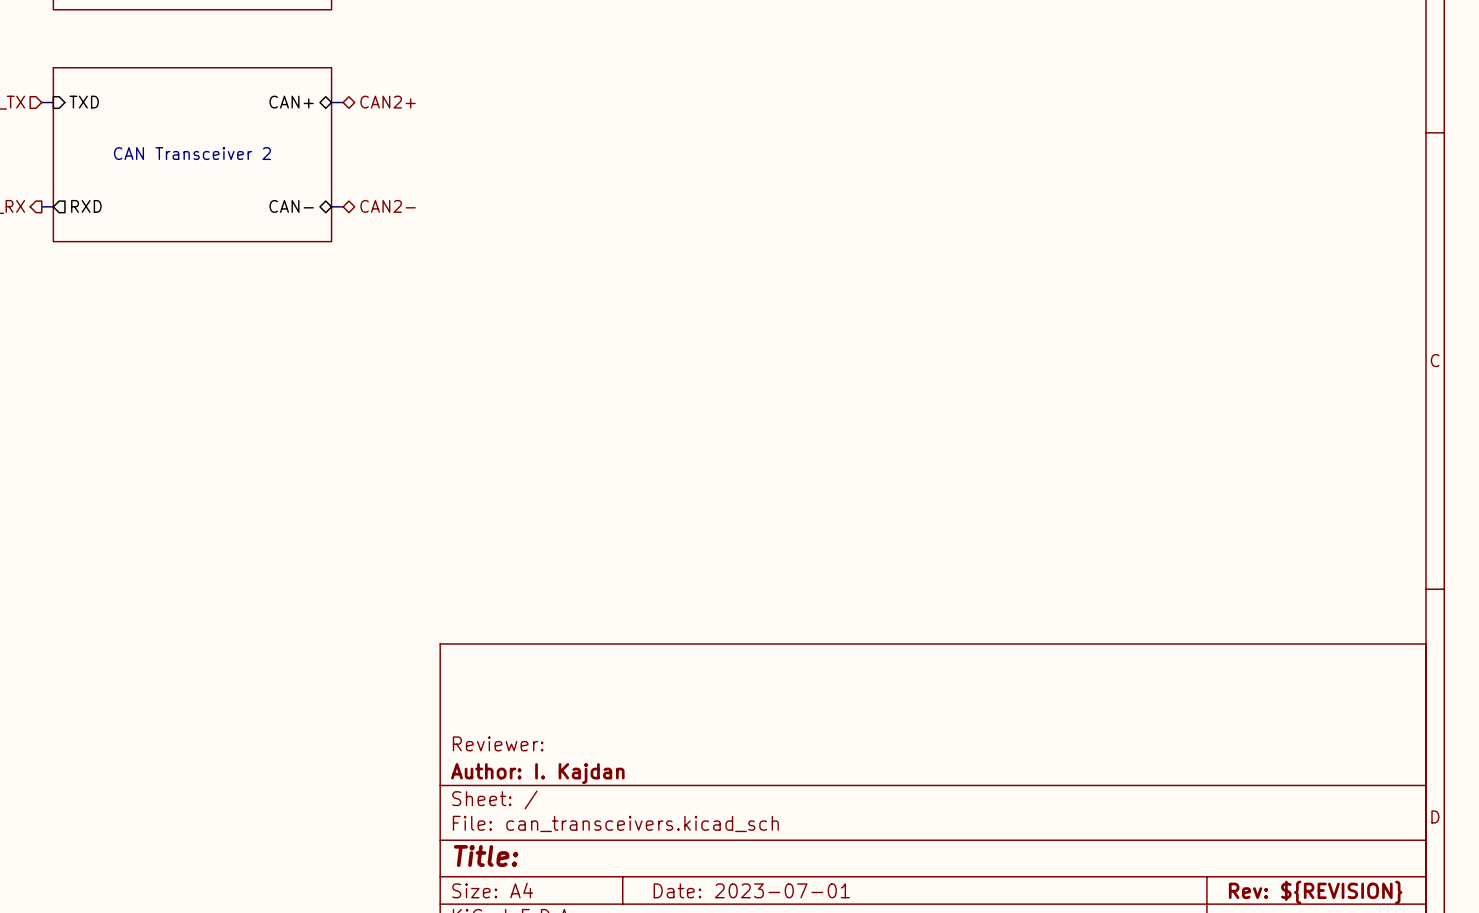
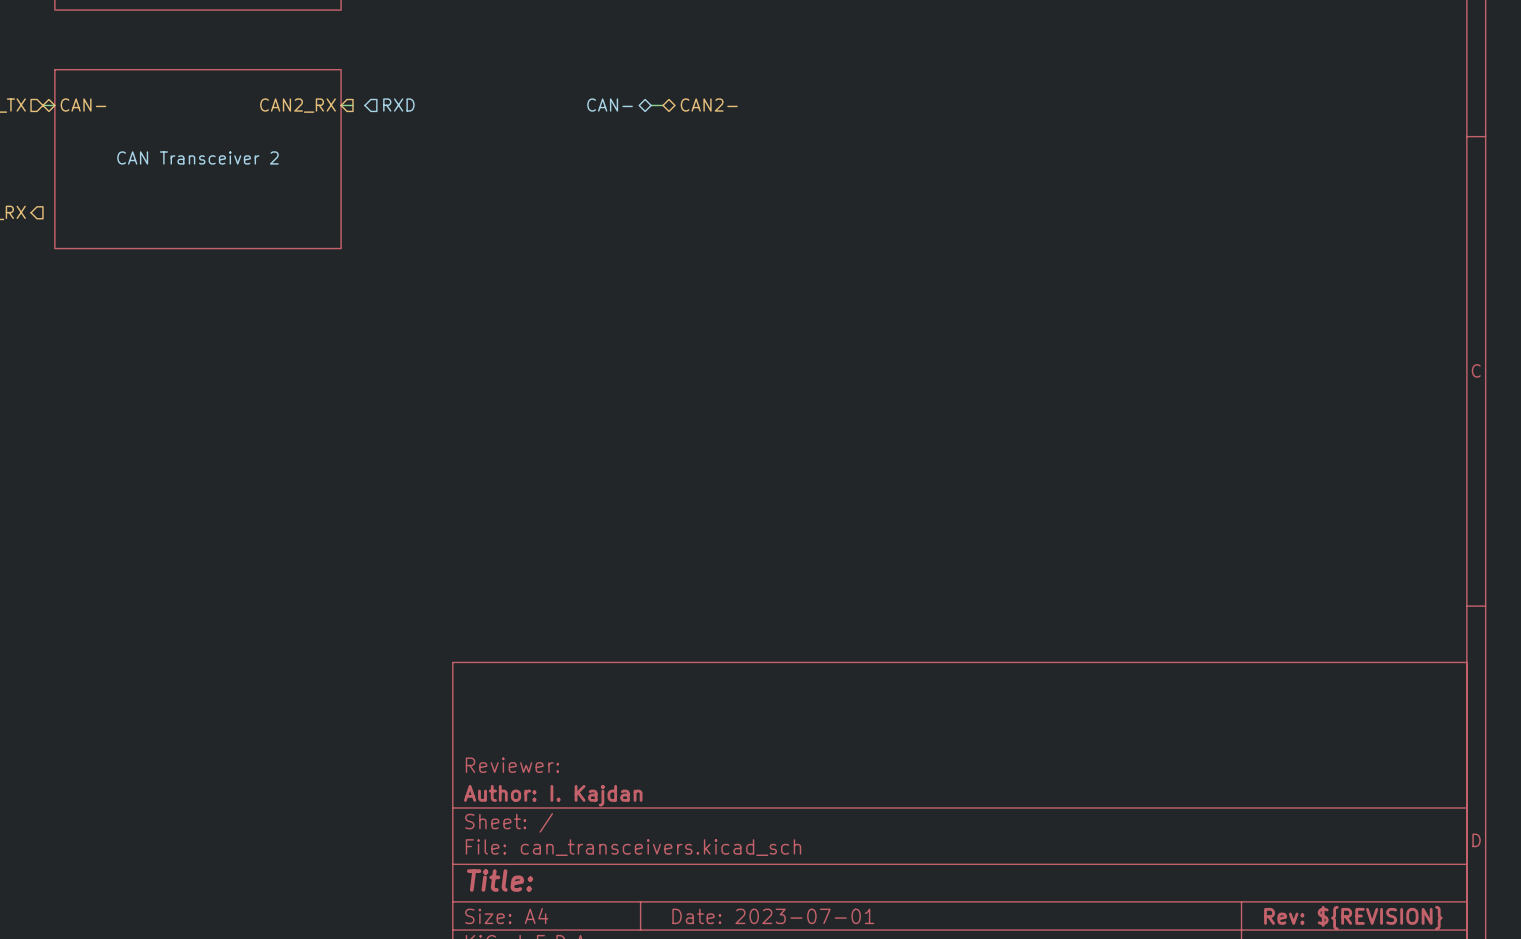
hierarchical label: none -> CAN- (83, 105)
sheet pin: TXD (84, 102) -> none
hierarchical label: none -> CAN2_RX (298, 105)
sheet pin: CAN+ (291, 102) -> none
sheet pin: none -> RXD (398, 105)
hierarchical label: CAN2+ (388, 102) -> none
sheet pin: none -> CAN- (610, 105)
wire: none -> (651, 105) (663, 105)
hierarchical label: none -> CAN2- (709, 105)
wire: (41, 206) (53, 206) -> none
sheet pin: RXD (86, 206) -> none
sheet pin: CAN- (291, 206) -> none
wire: (331, 206) (343, 206) -> none
hierarchical label: CAN2- (388, 206) -> none

